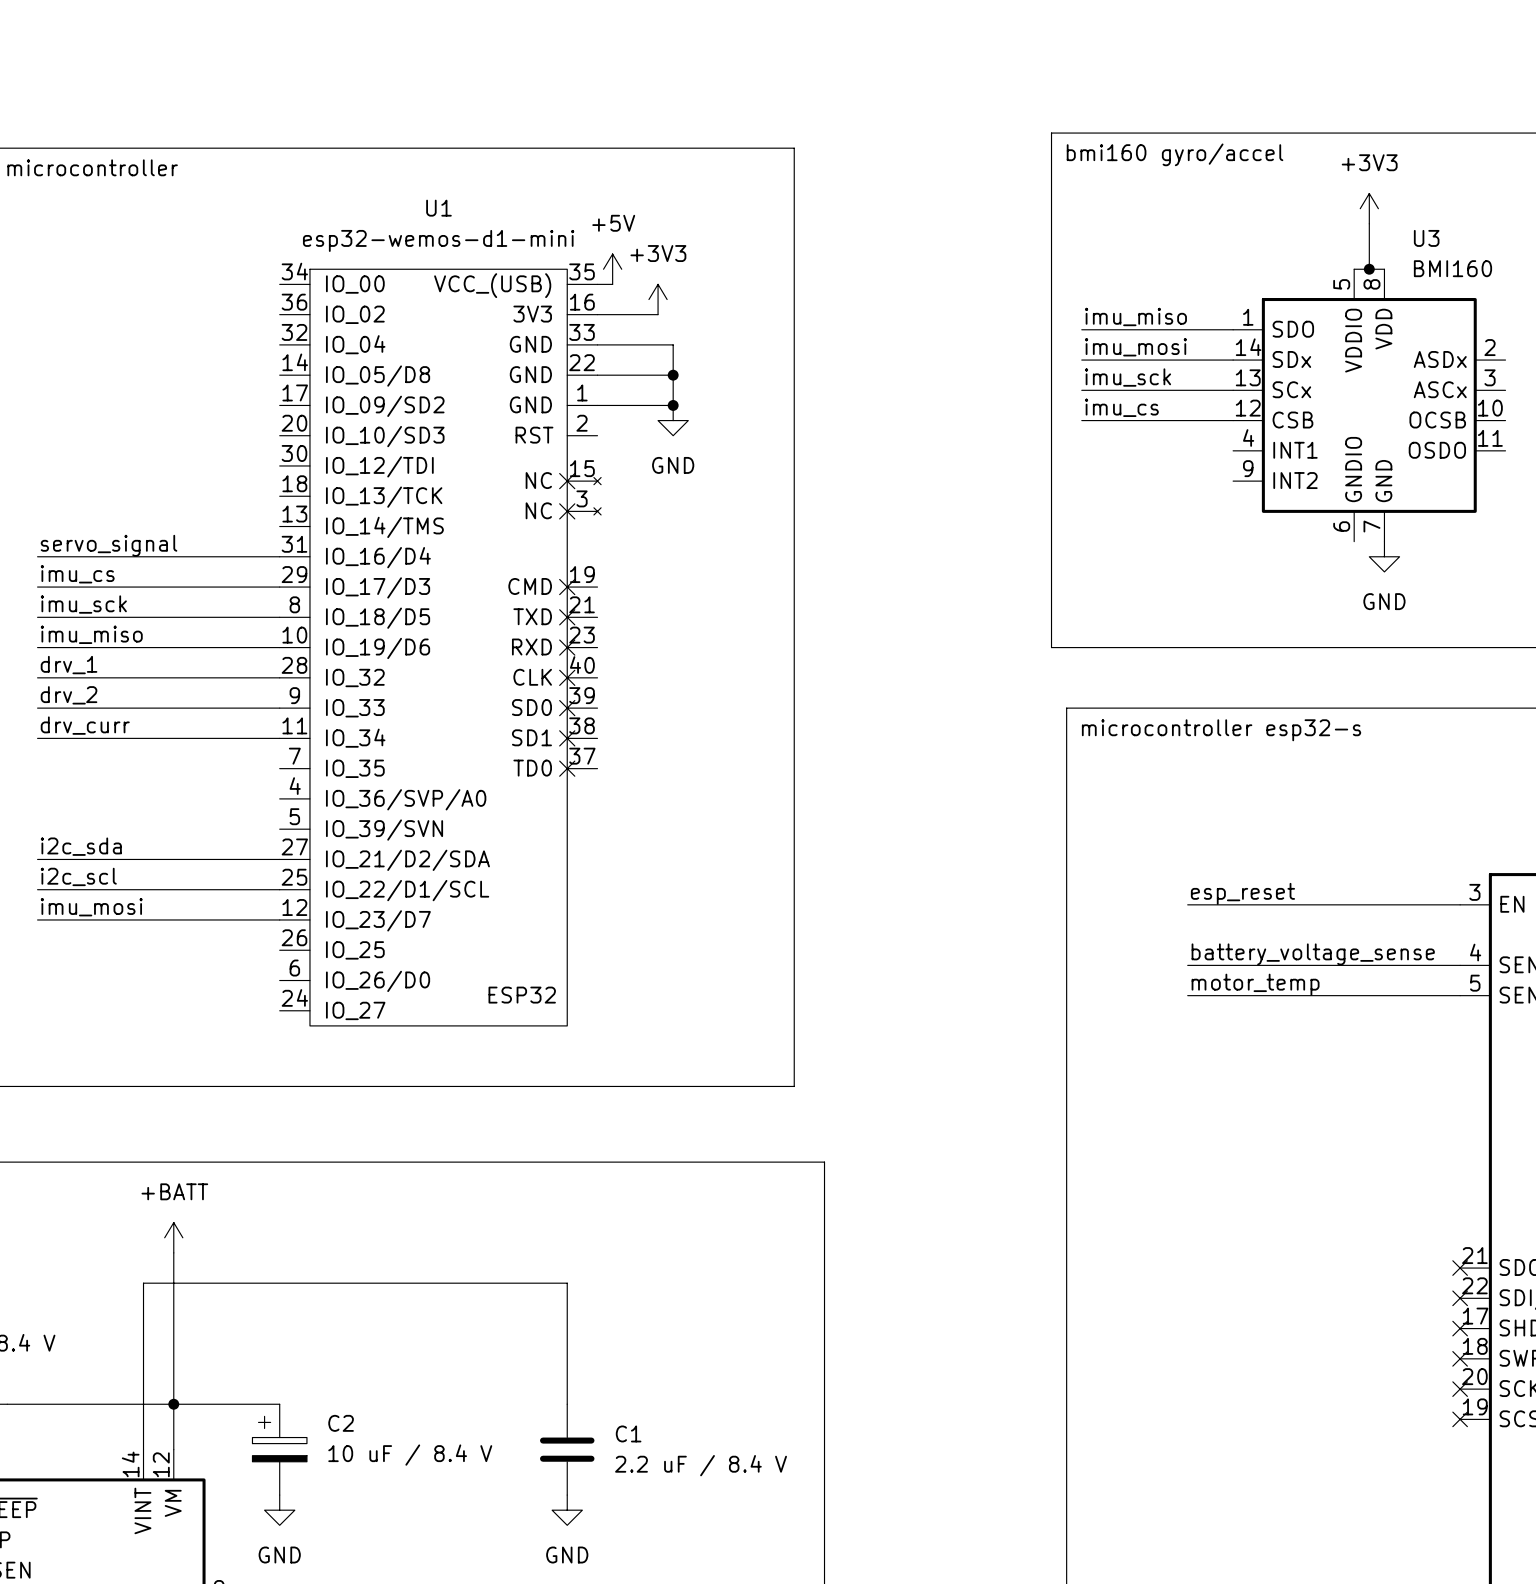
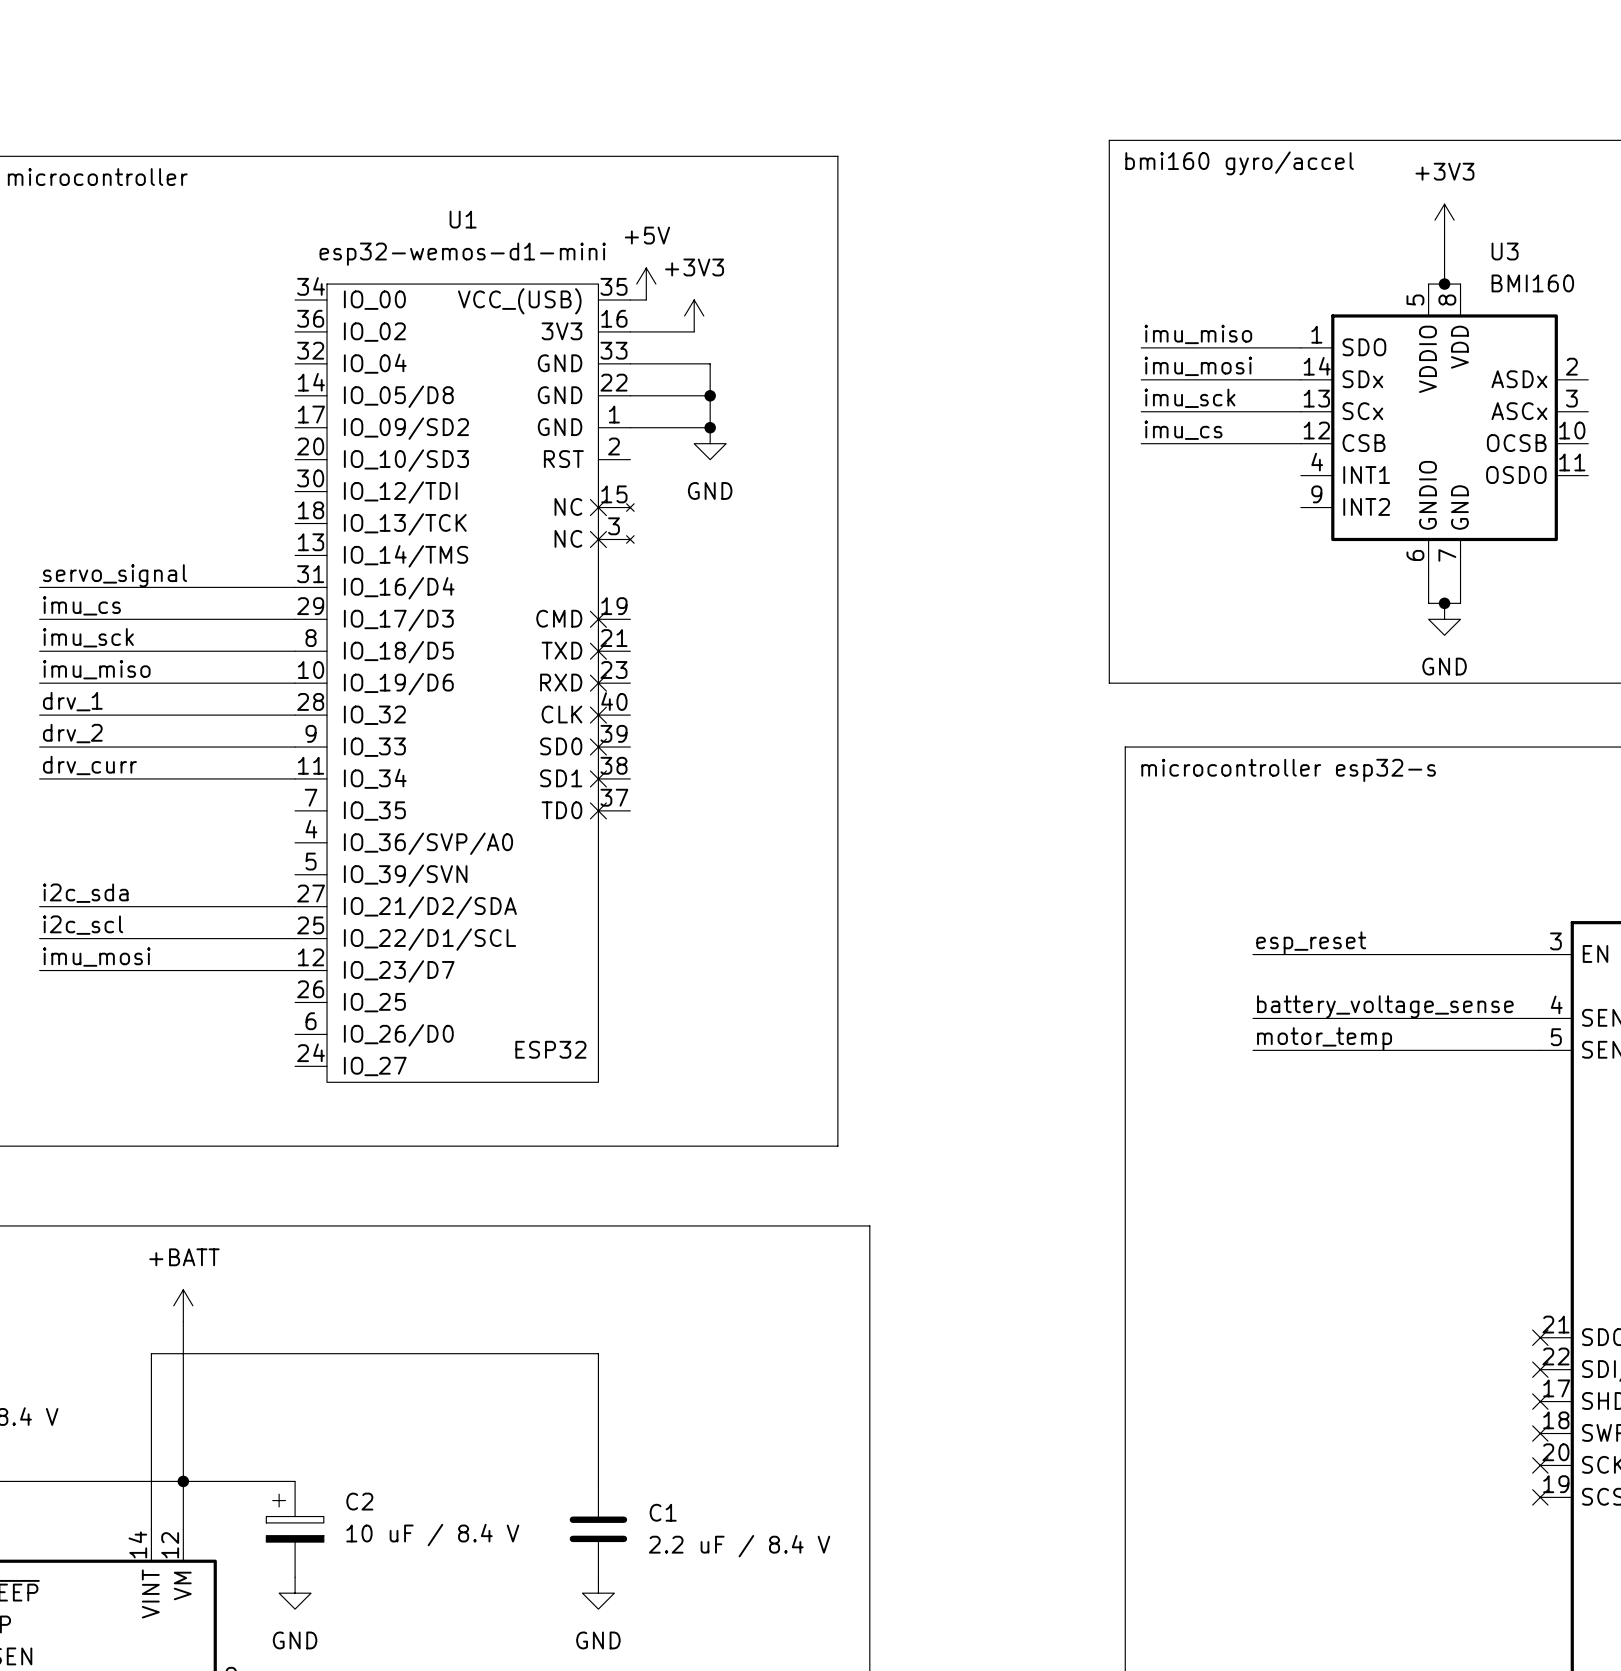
wire: none -> (1428, 571) (1428, 603) (1460, 603) (1460, 571)
power symbol position: GND (1384, 556) -> GND (1444, 619)
junction: none -> (1444, 603)

